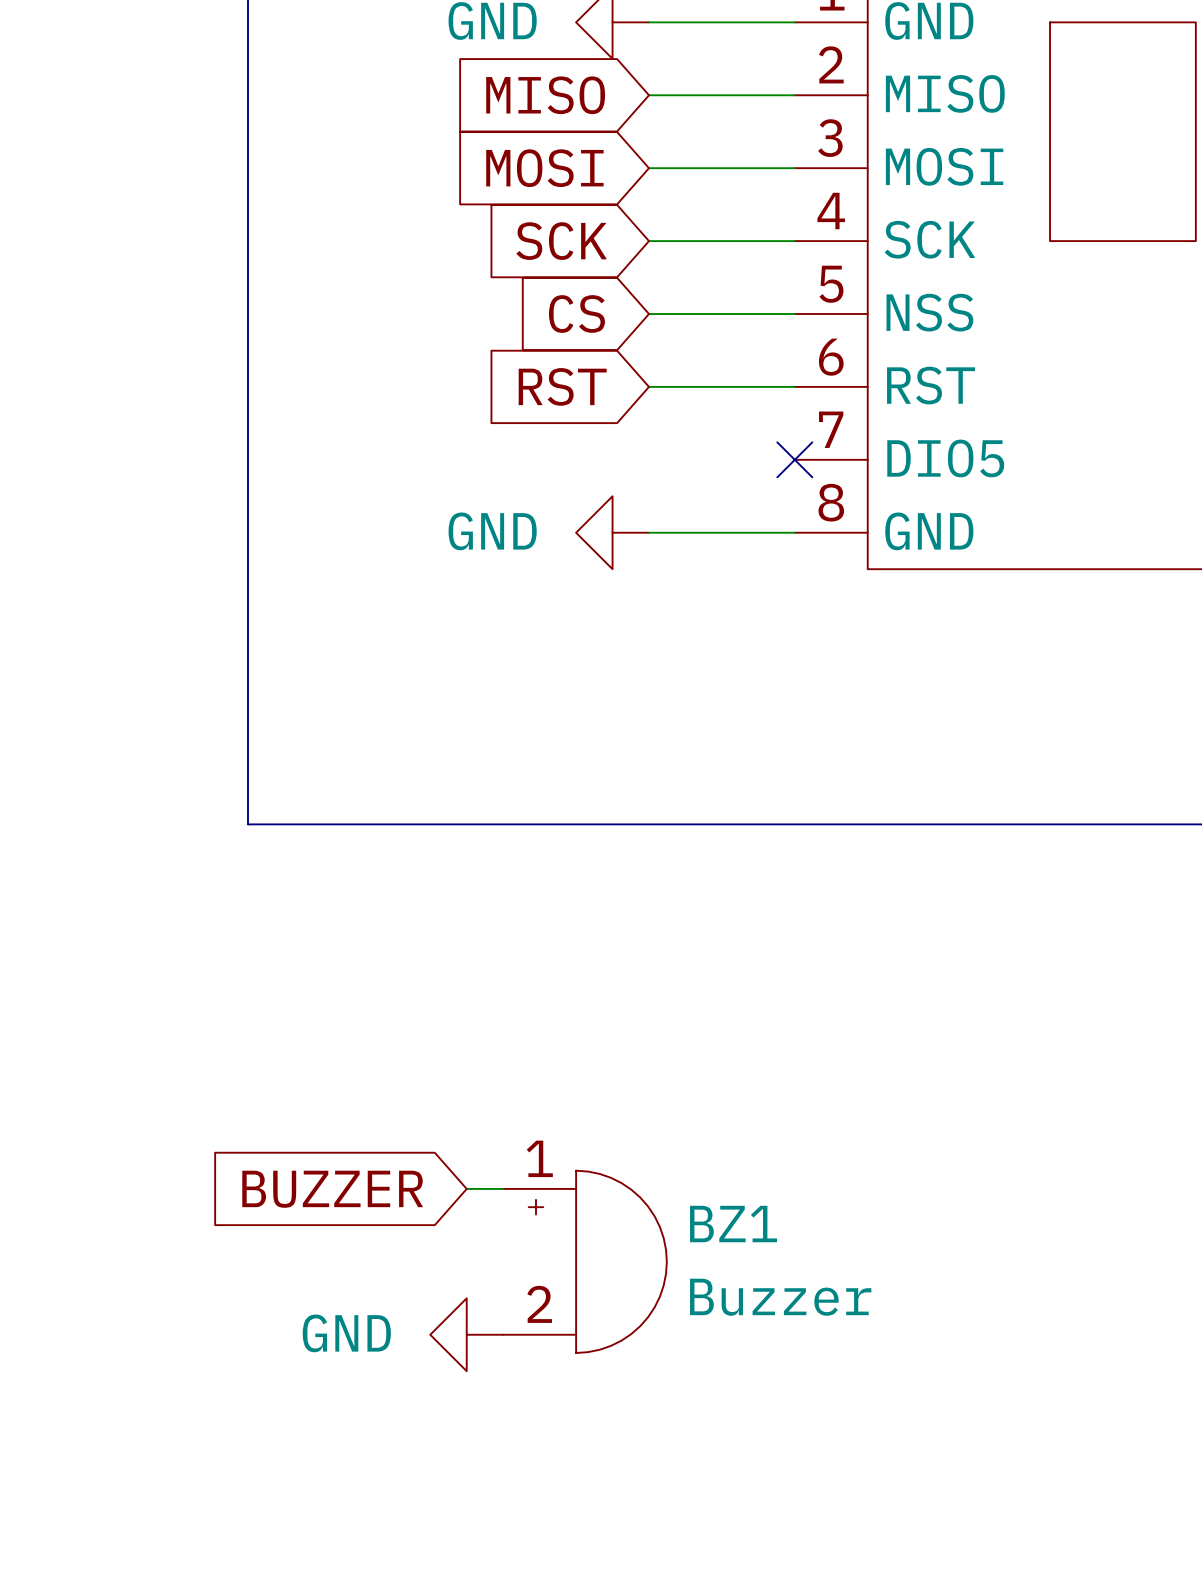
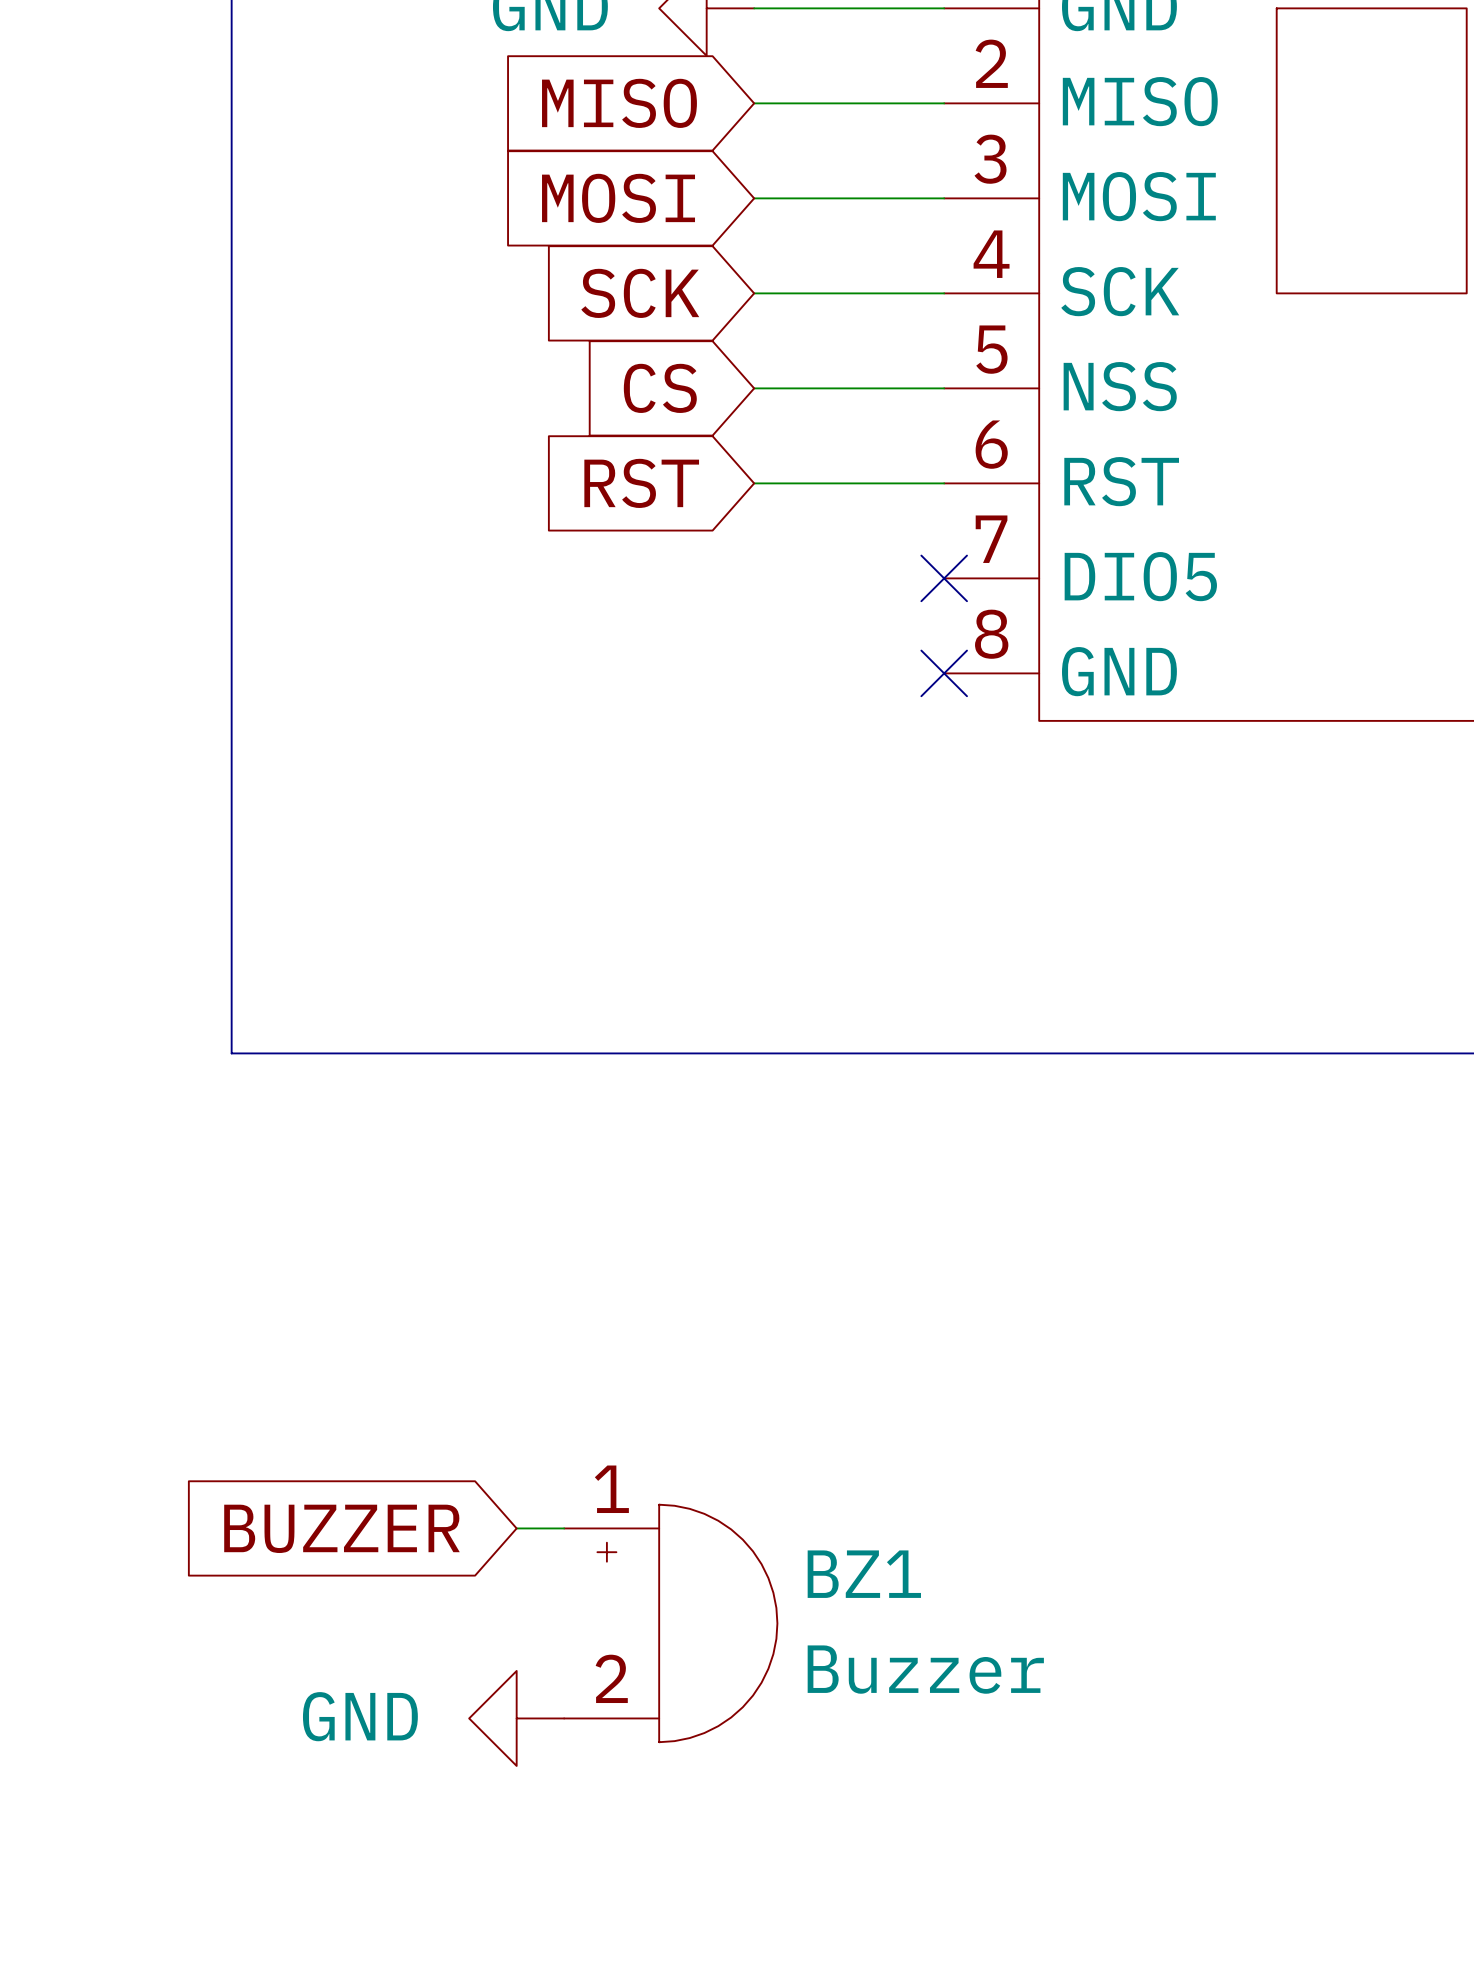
power symbol: GND (612, 532) -> none
wire: (649, 532) (794, 532) -> none
no-connect mark: none -> (944, 673)

